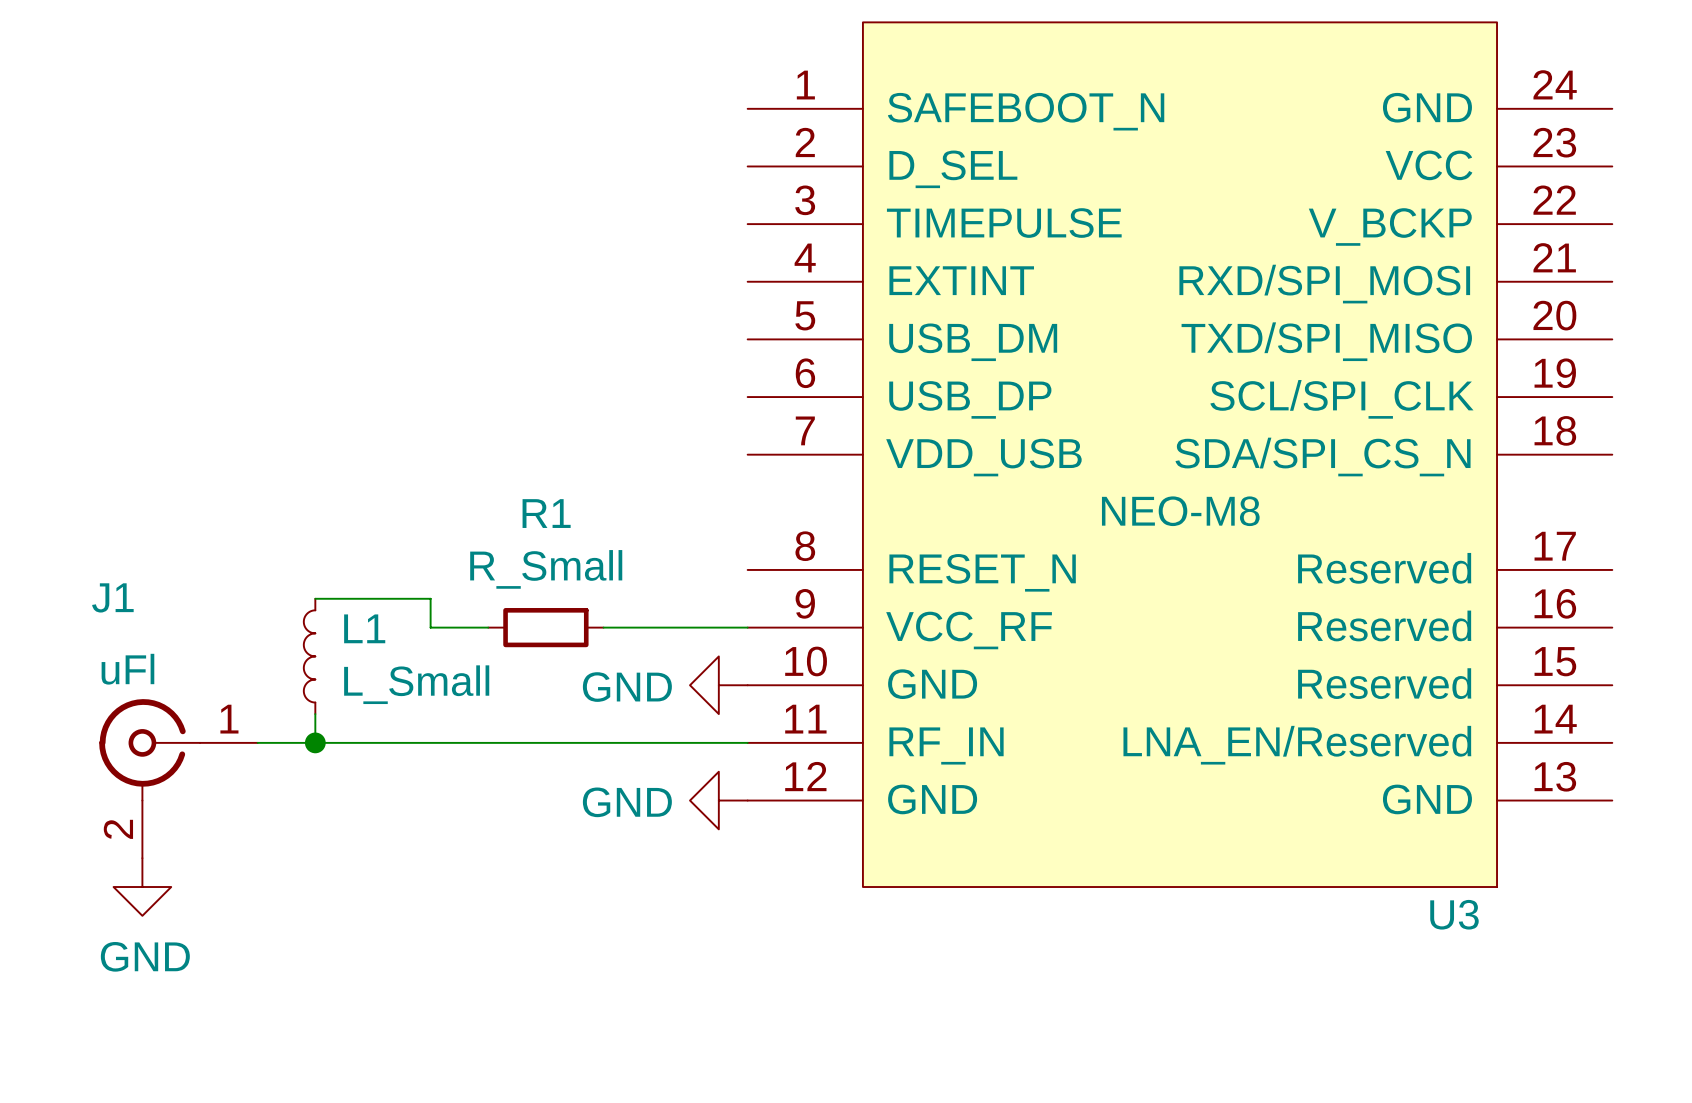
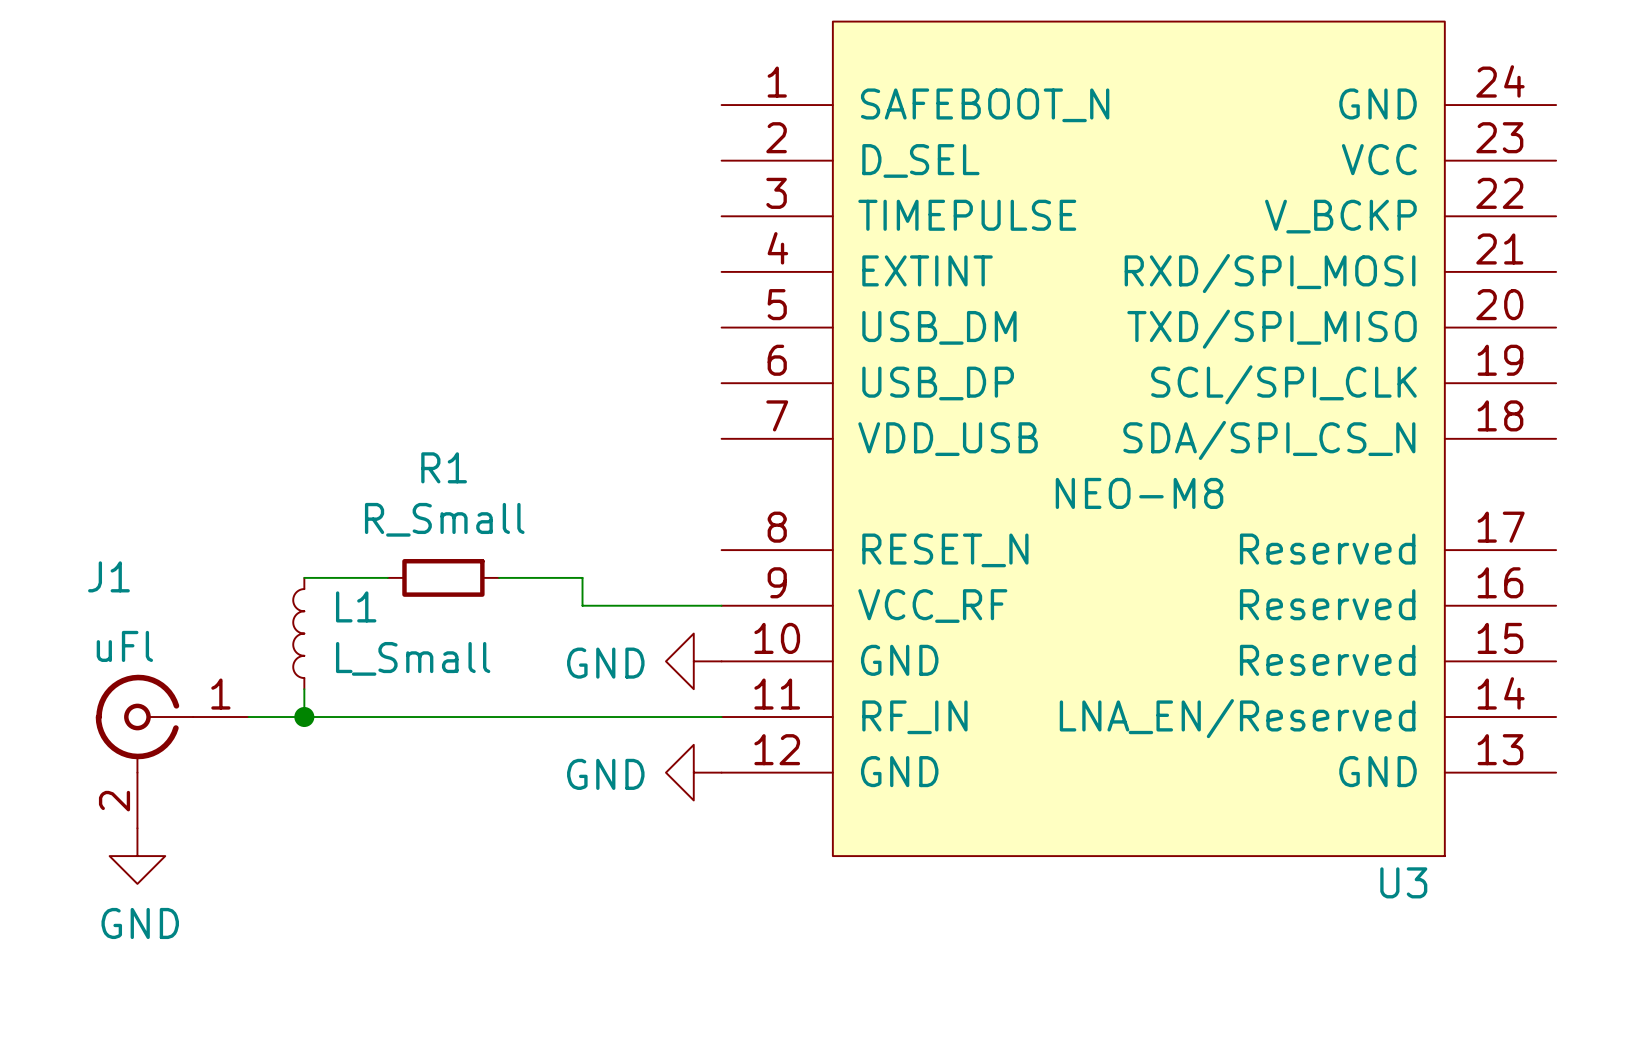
wire: (401, 598) (430, 598) (430, 627) (488, 627) -> none
wire: none -> (499, 577) (582, 577) (582, 605)
R1 position: (545, 627) -> (443, 577)

